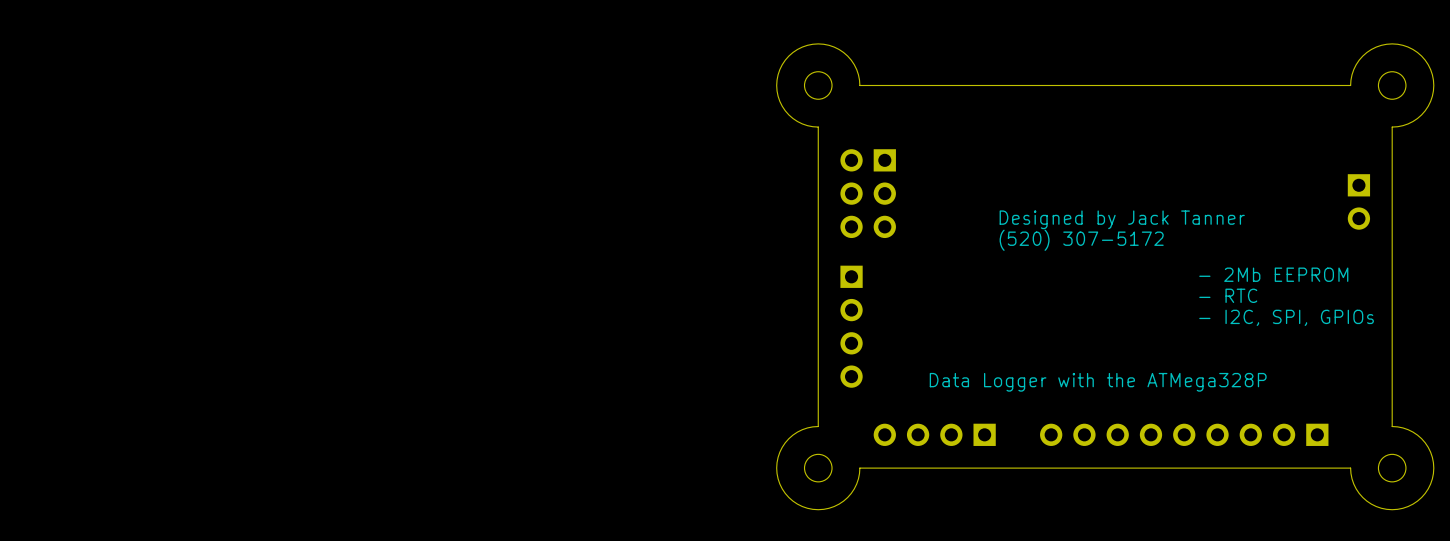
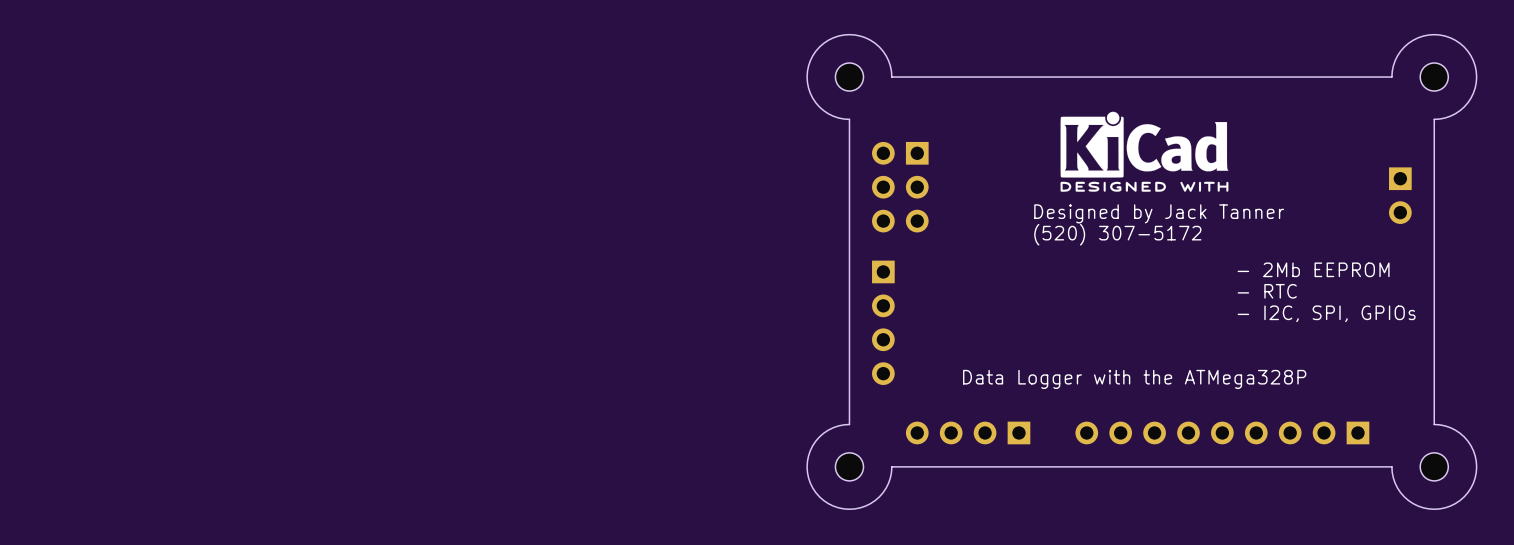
drawing: none -> [1060, 111, 1229, 192]

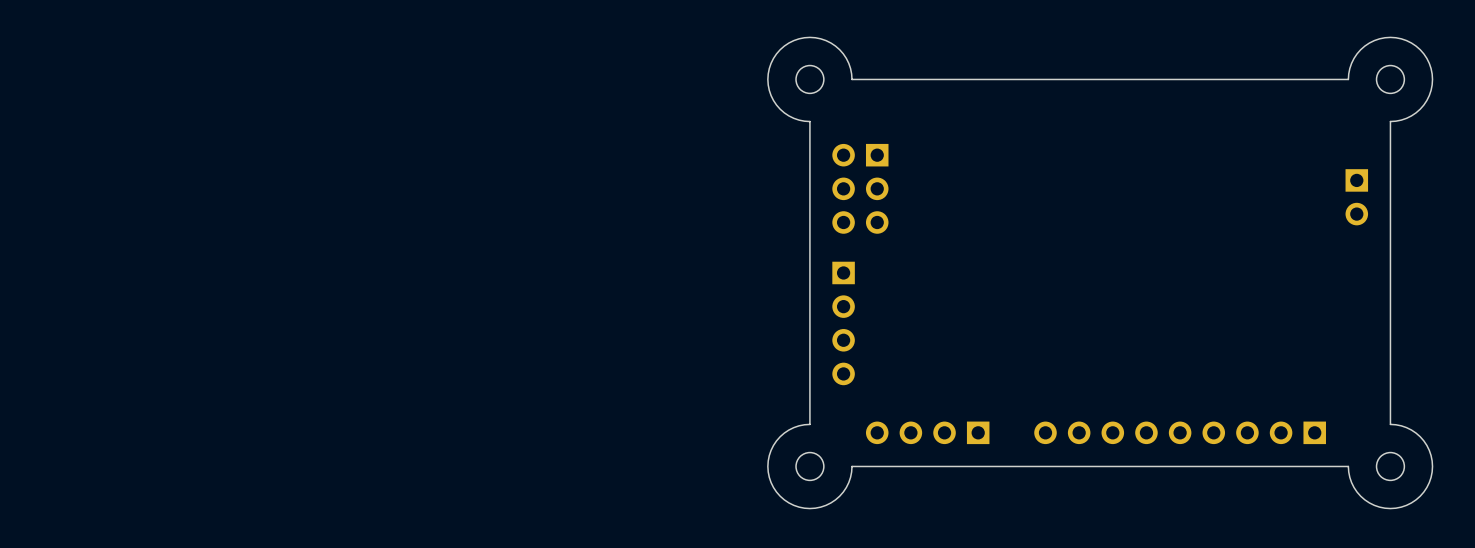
drawing: [1060, 111, 1229, 192] -> none
text: Designed by Jack Tanner (1159, 213) -> none
text: (520) 307-5172 (1117, 234) -> none
text: - 2Mb EEPROM (1313, 269) -> none
text: - RTC (1267, 291) -> none
text: - I2C, SPI, GPIOs (1326, 313) -> none
text: Data Logger with the ATMega328P (1134, 379) -> none

